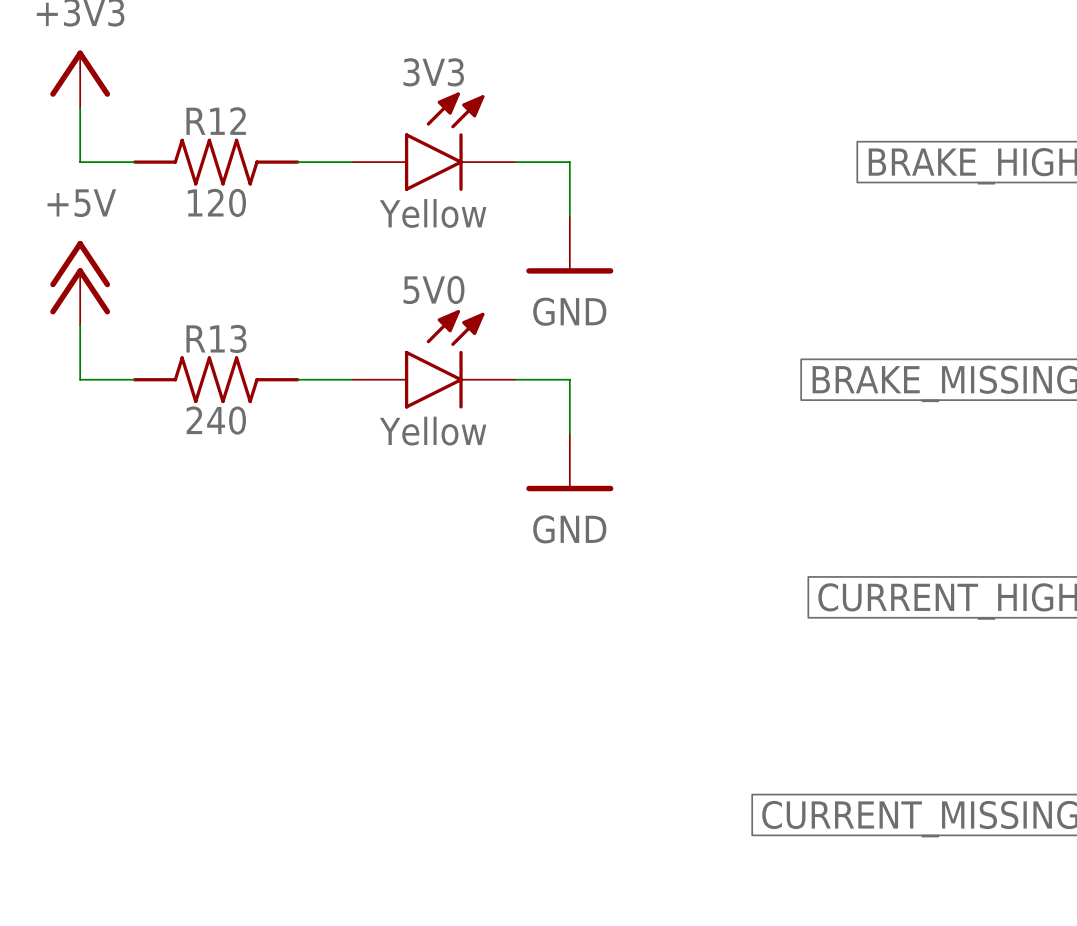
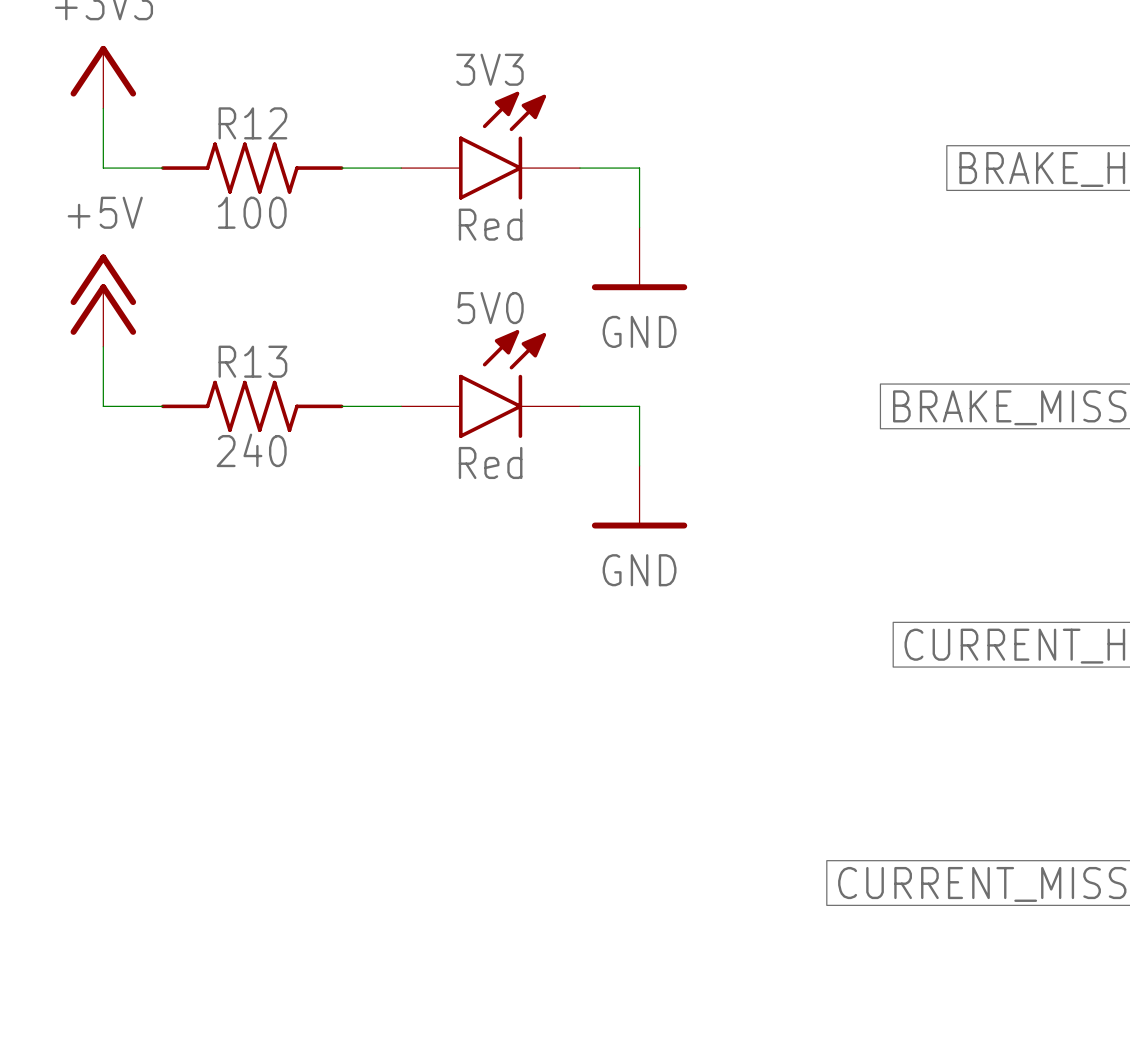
R12 text: 120 (216, 202) -> 100 (252, 212)
3V3 text: Yellow (433, 213) -> Red (490, 224)
5V0 text: Yellow (433, 431) -> Red (490, 462)

